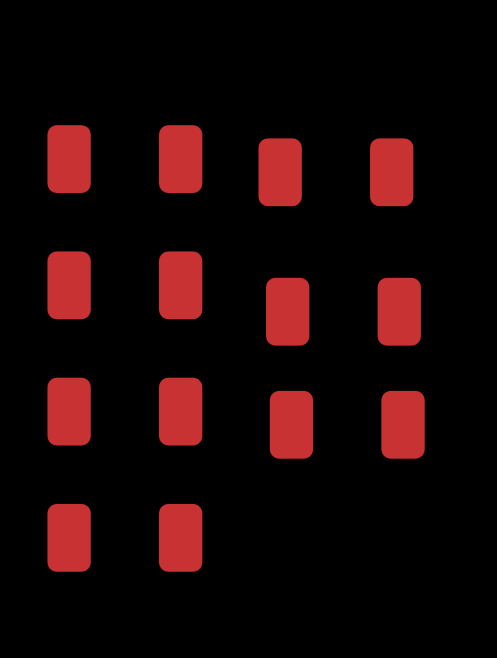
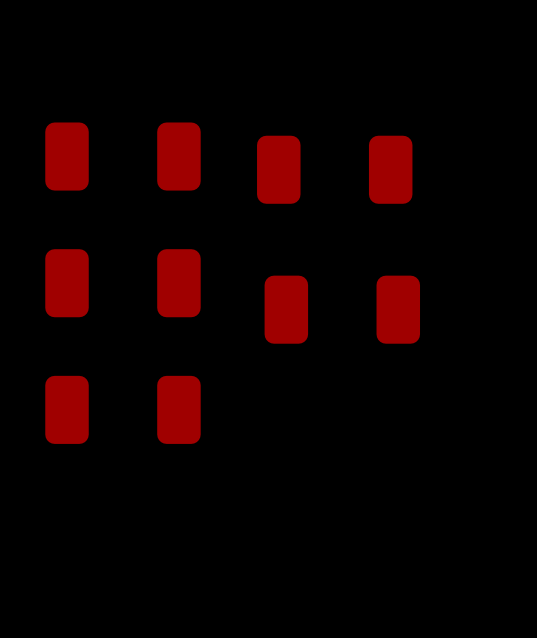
part: (347, 424) -> none
part: (124, 537) -> none

